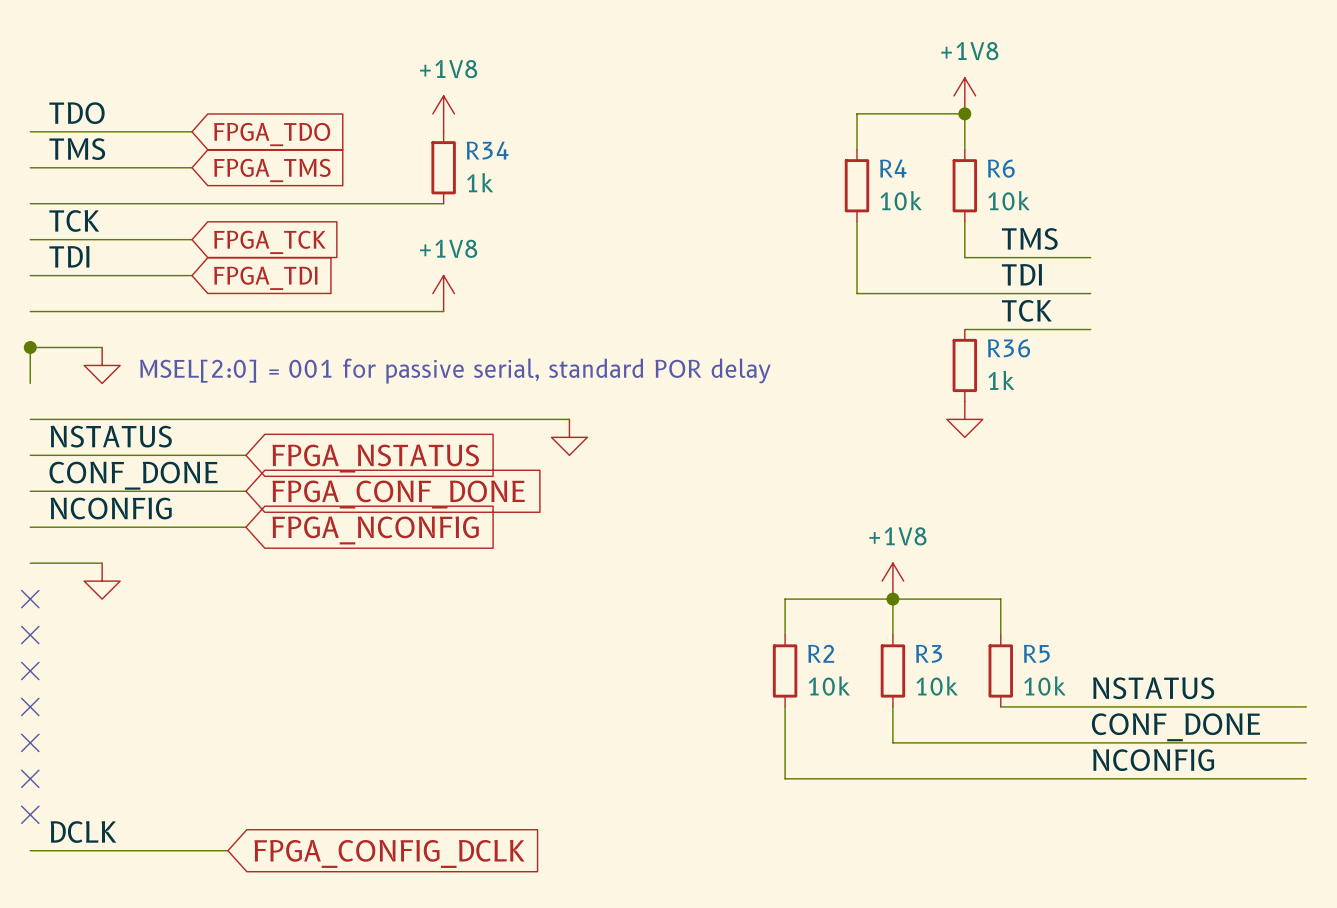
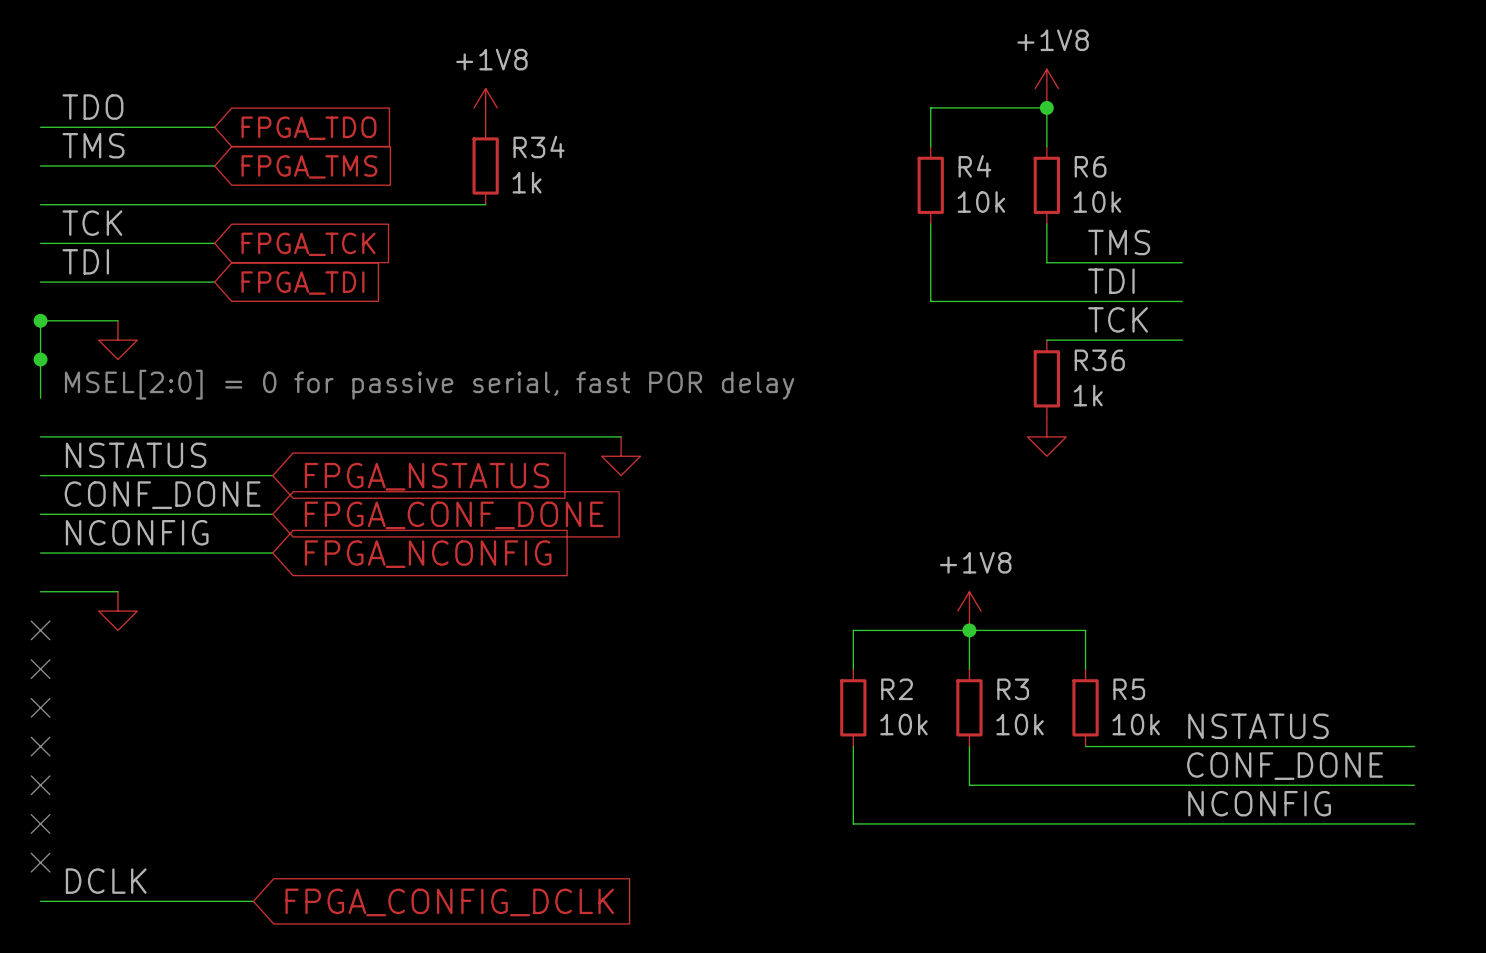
power symbol: +1V8 (443, 293) -> none
junction: none -> (40, 320)
wire: (102, 311) (443, 311) -> none
wire: (30, 347) (102, 347) -> (40, 359) (40, 320)
power symbol position: (102, 365) -> (117, 340)
text: MSEL[2:0] = 001 for passive serial, standard POR delay (455, 371) -> MSEL[2:0] = 0 for passive serial, fast POR delay (429, 384)

